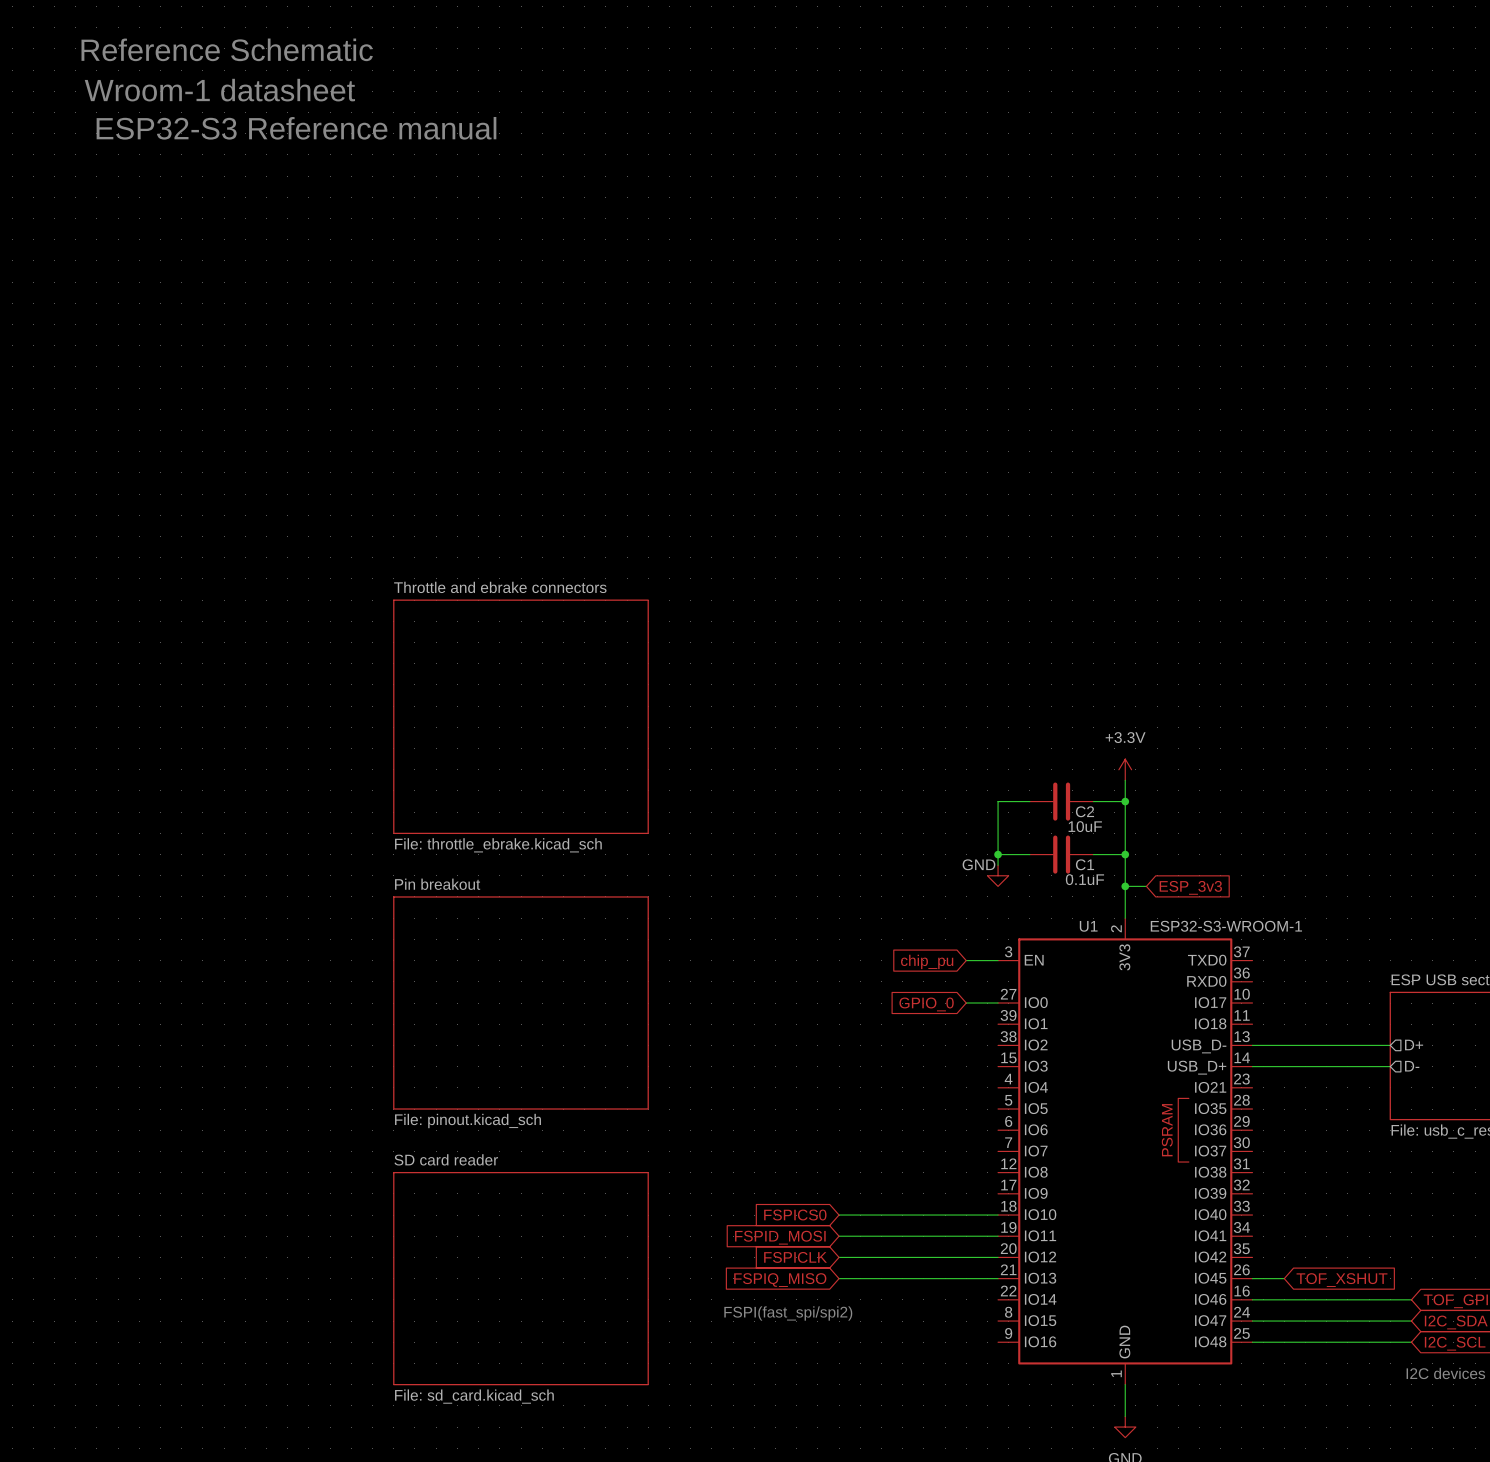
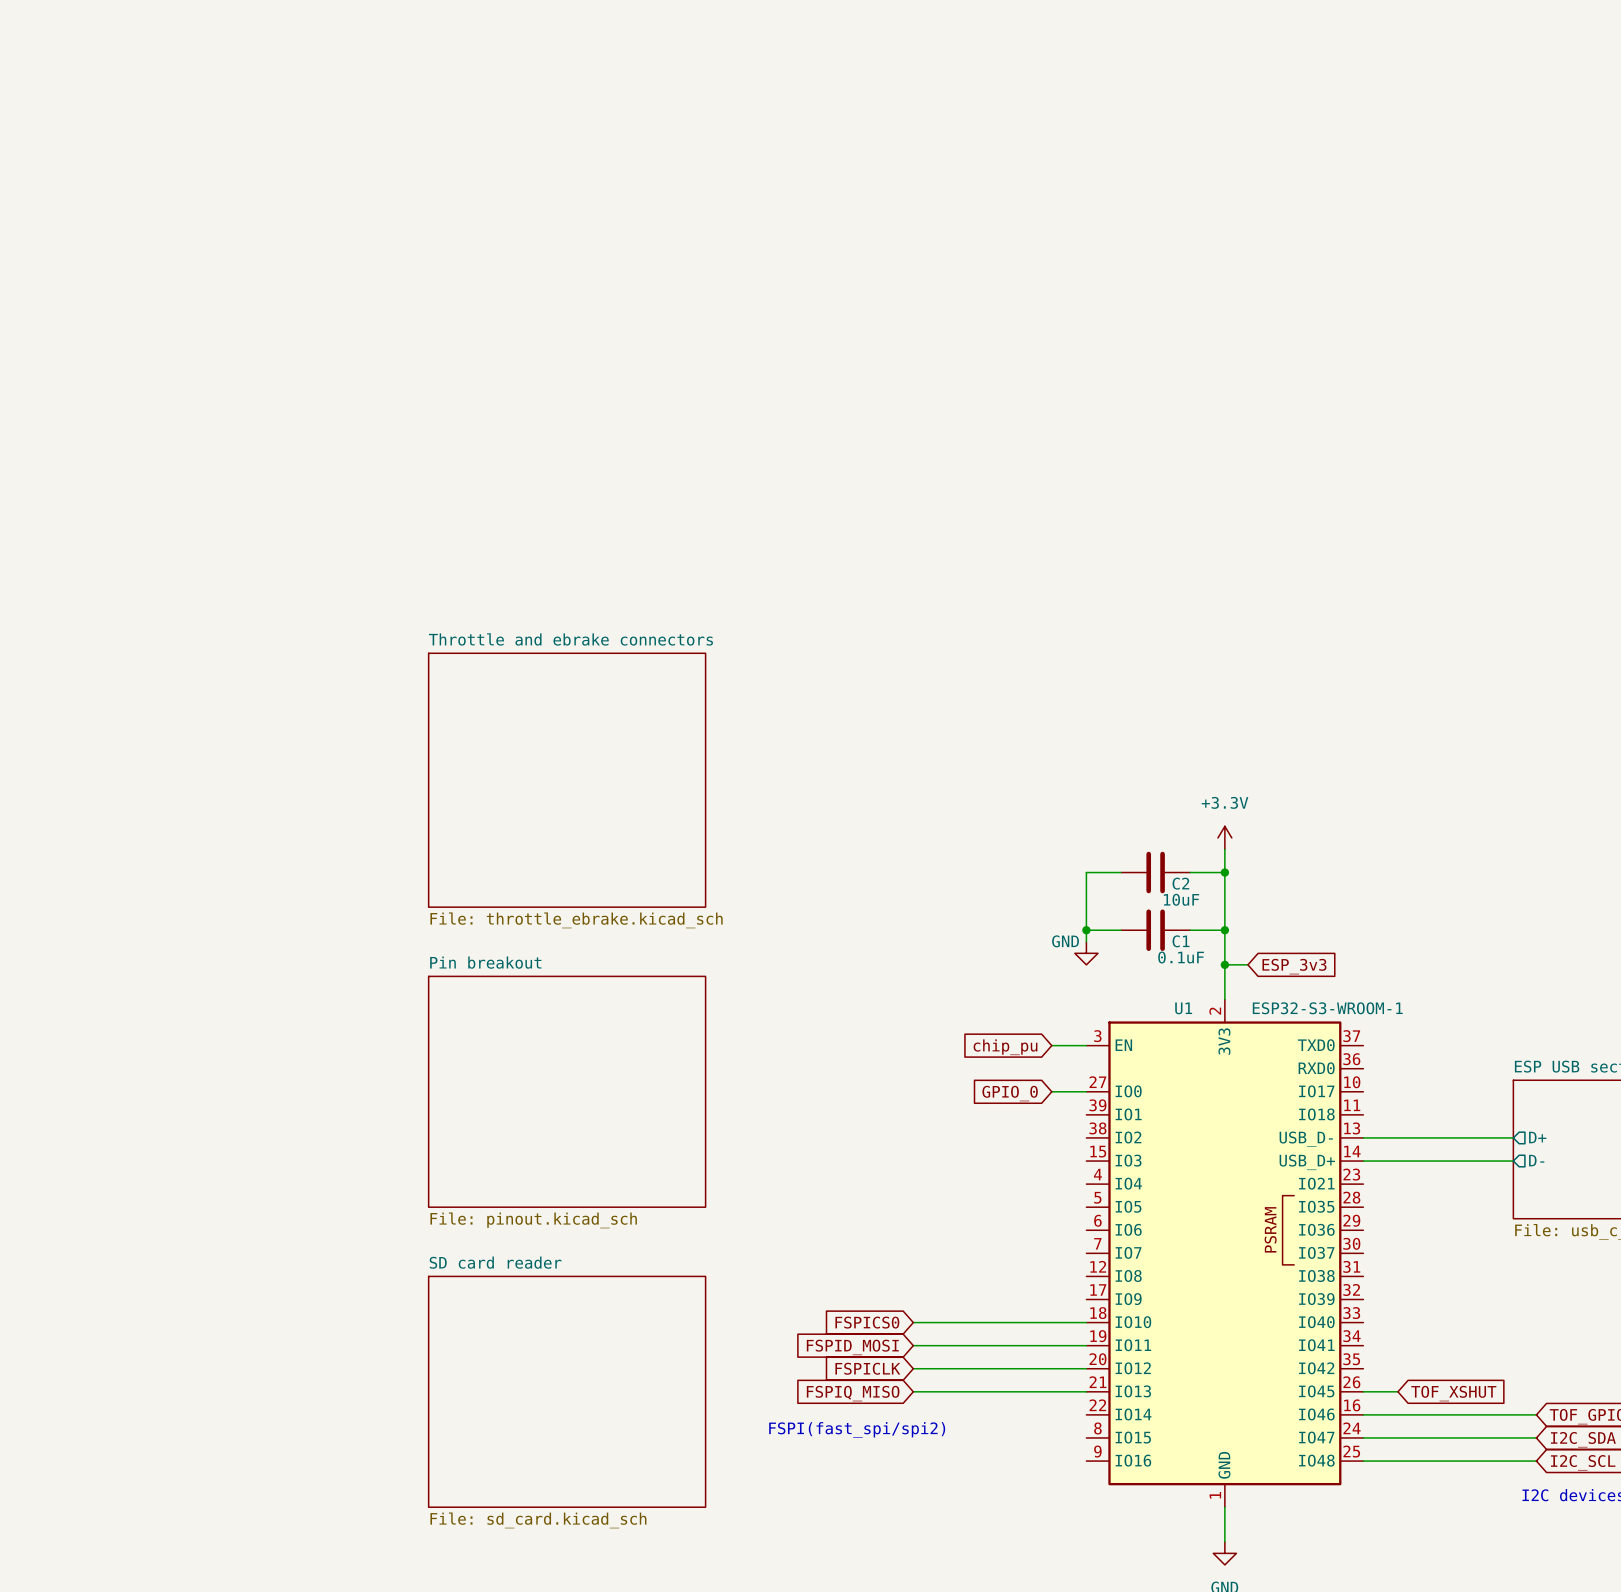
text: Reference Schematic (227, 49) -> none
text: Wroom-1 datasheet (219, 90) -> none
text: ESP32-S3 Reference manual (296, 128) -> none

